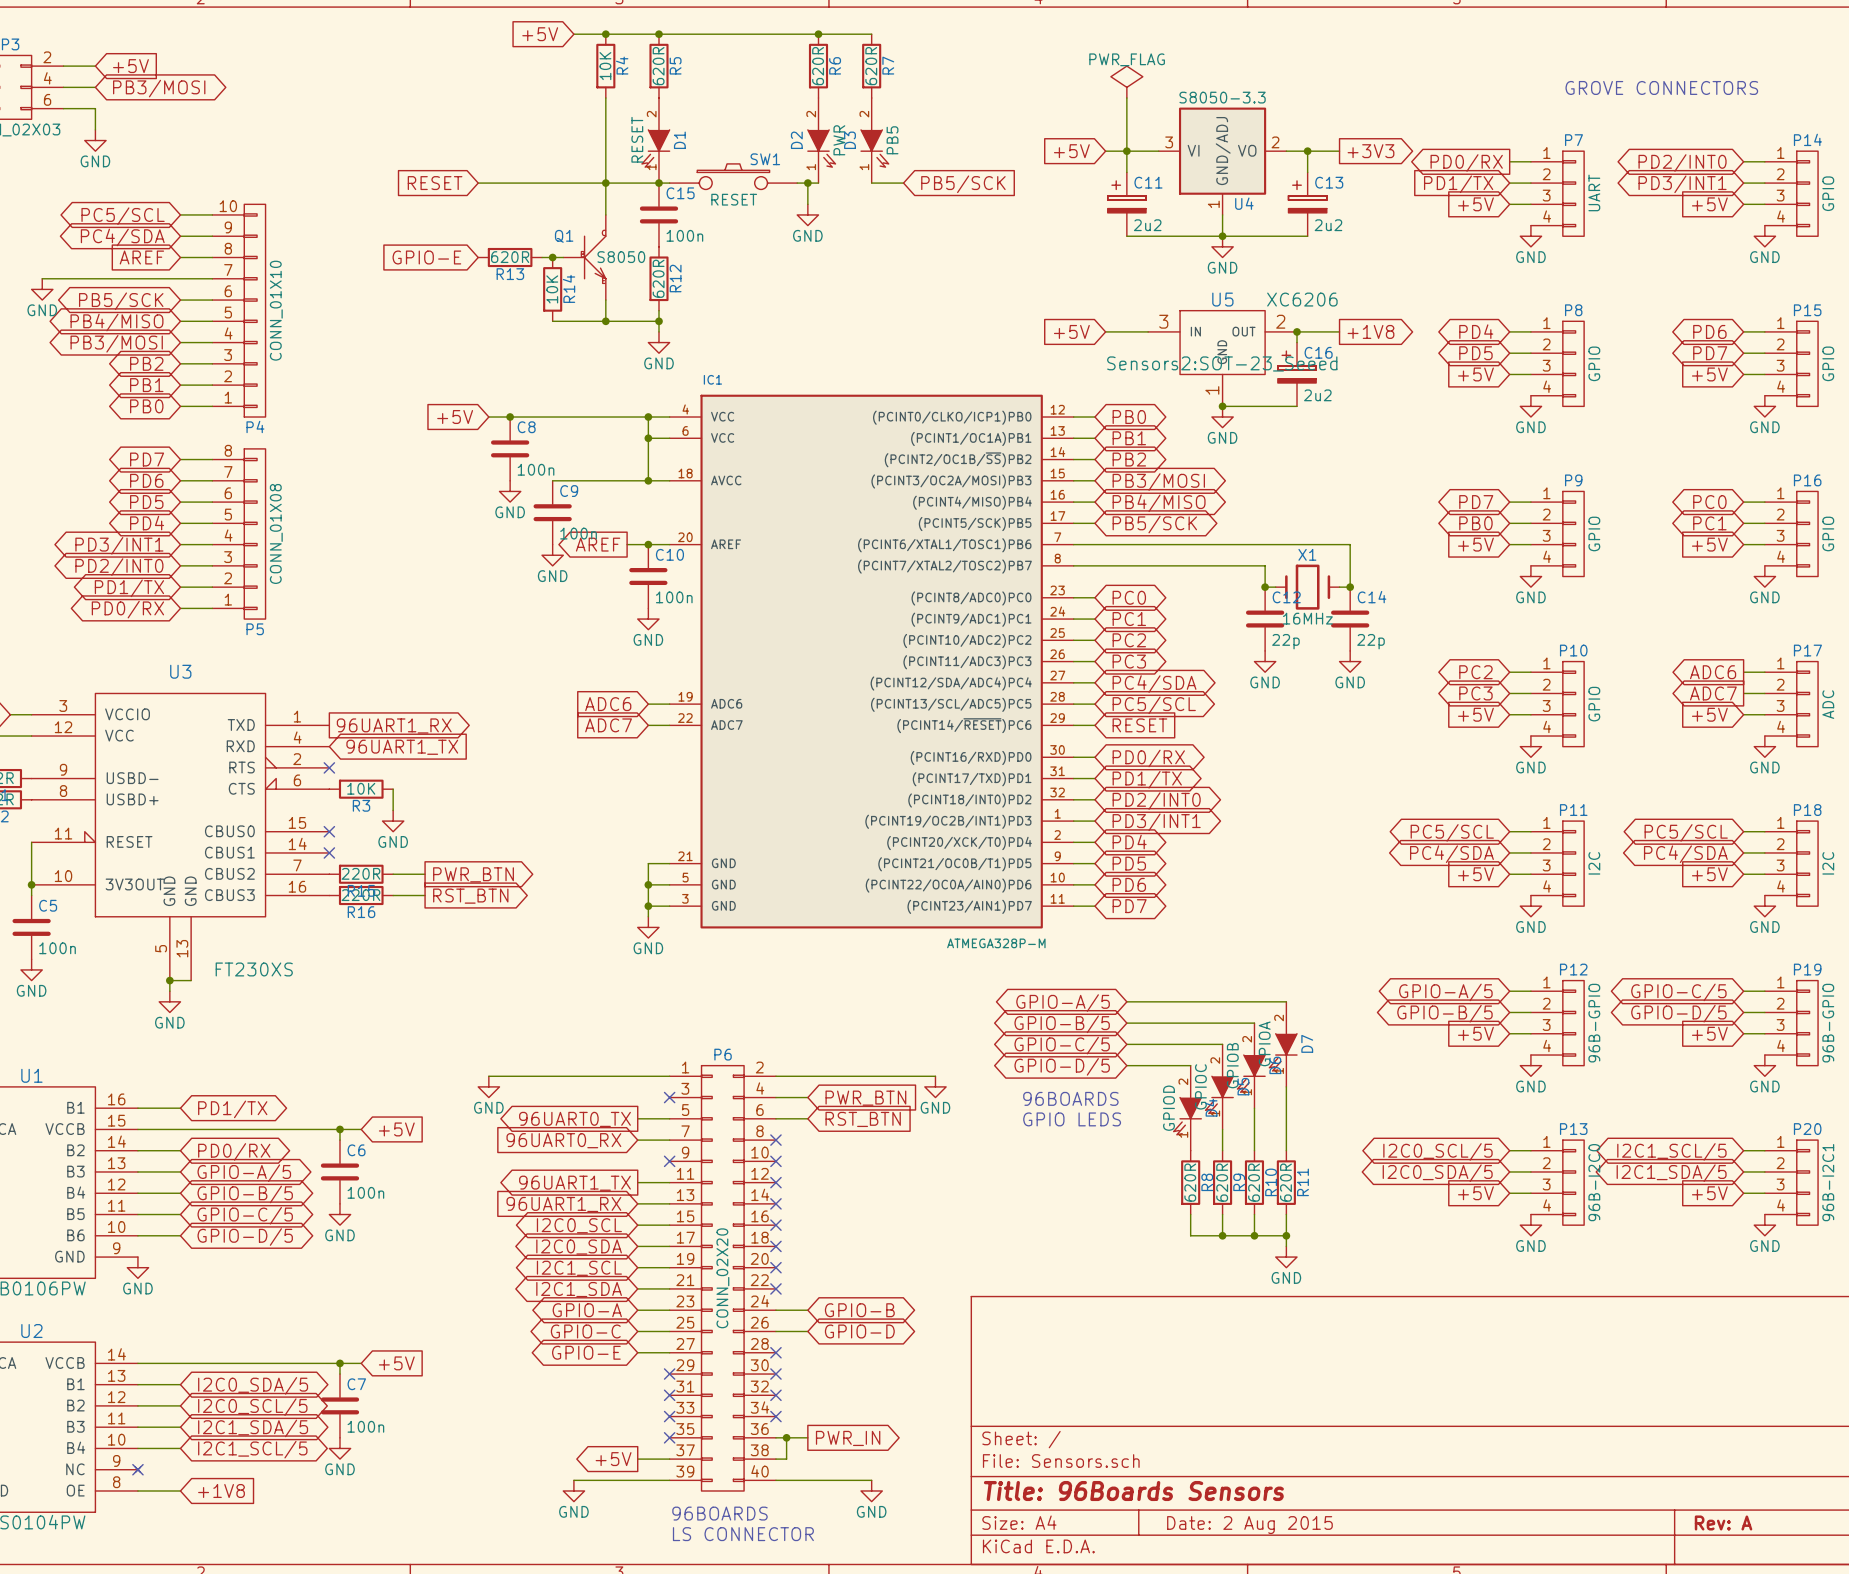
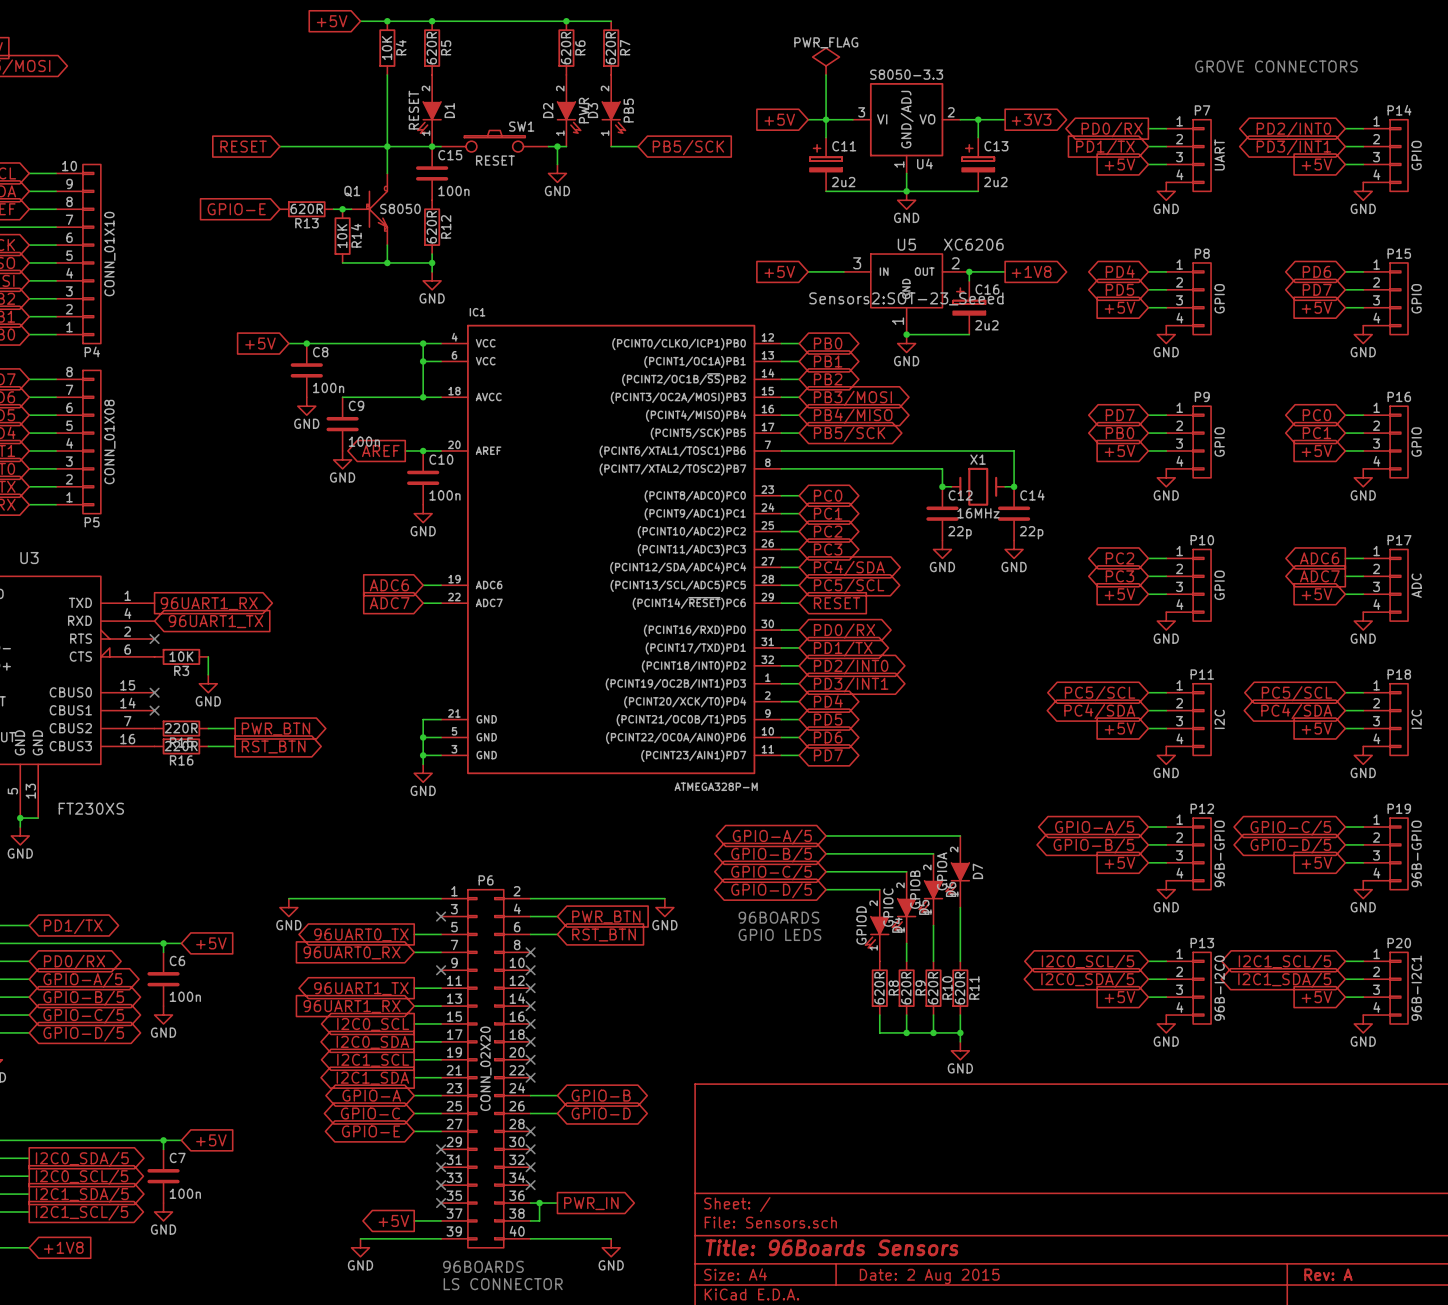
global label shape: bidirectional (579, 1225) -> output (373, 1024)
global label shape: bidirectional (579, 1247) -> output (372, 1042)
global label shape: bidirectional (579, 1268) -> output (373, 1060)
global label shape: bidirectional (579, 1289) -> output (372, 1078)
global label shape: bidirectional (253, 1385) -> output (82, 1159)
global label shape: bidirectional (252, 1407) -> output (82, 1177)
global label shape: bidirectional (253, 1428) -> output (82, 1195)
global label shape: bidirectional (252, 1449) -> output (82, 1213)

